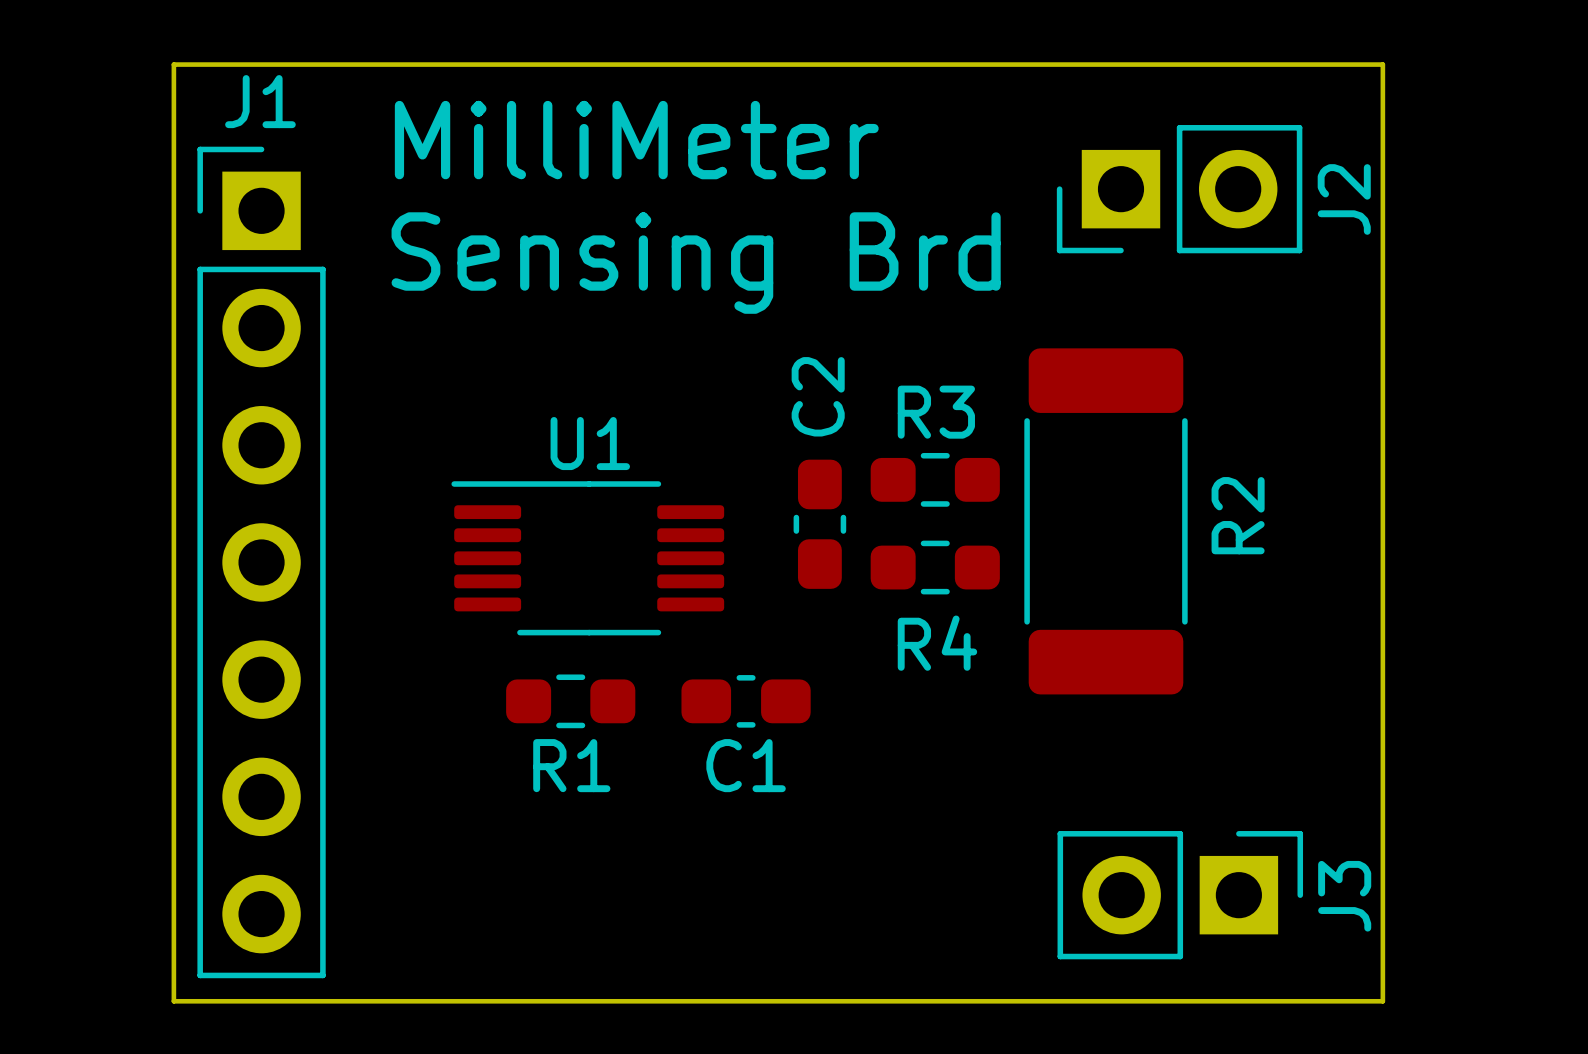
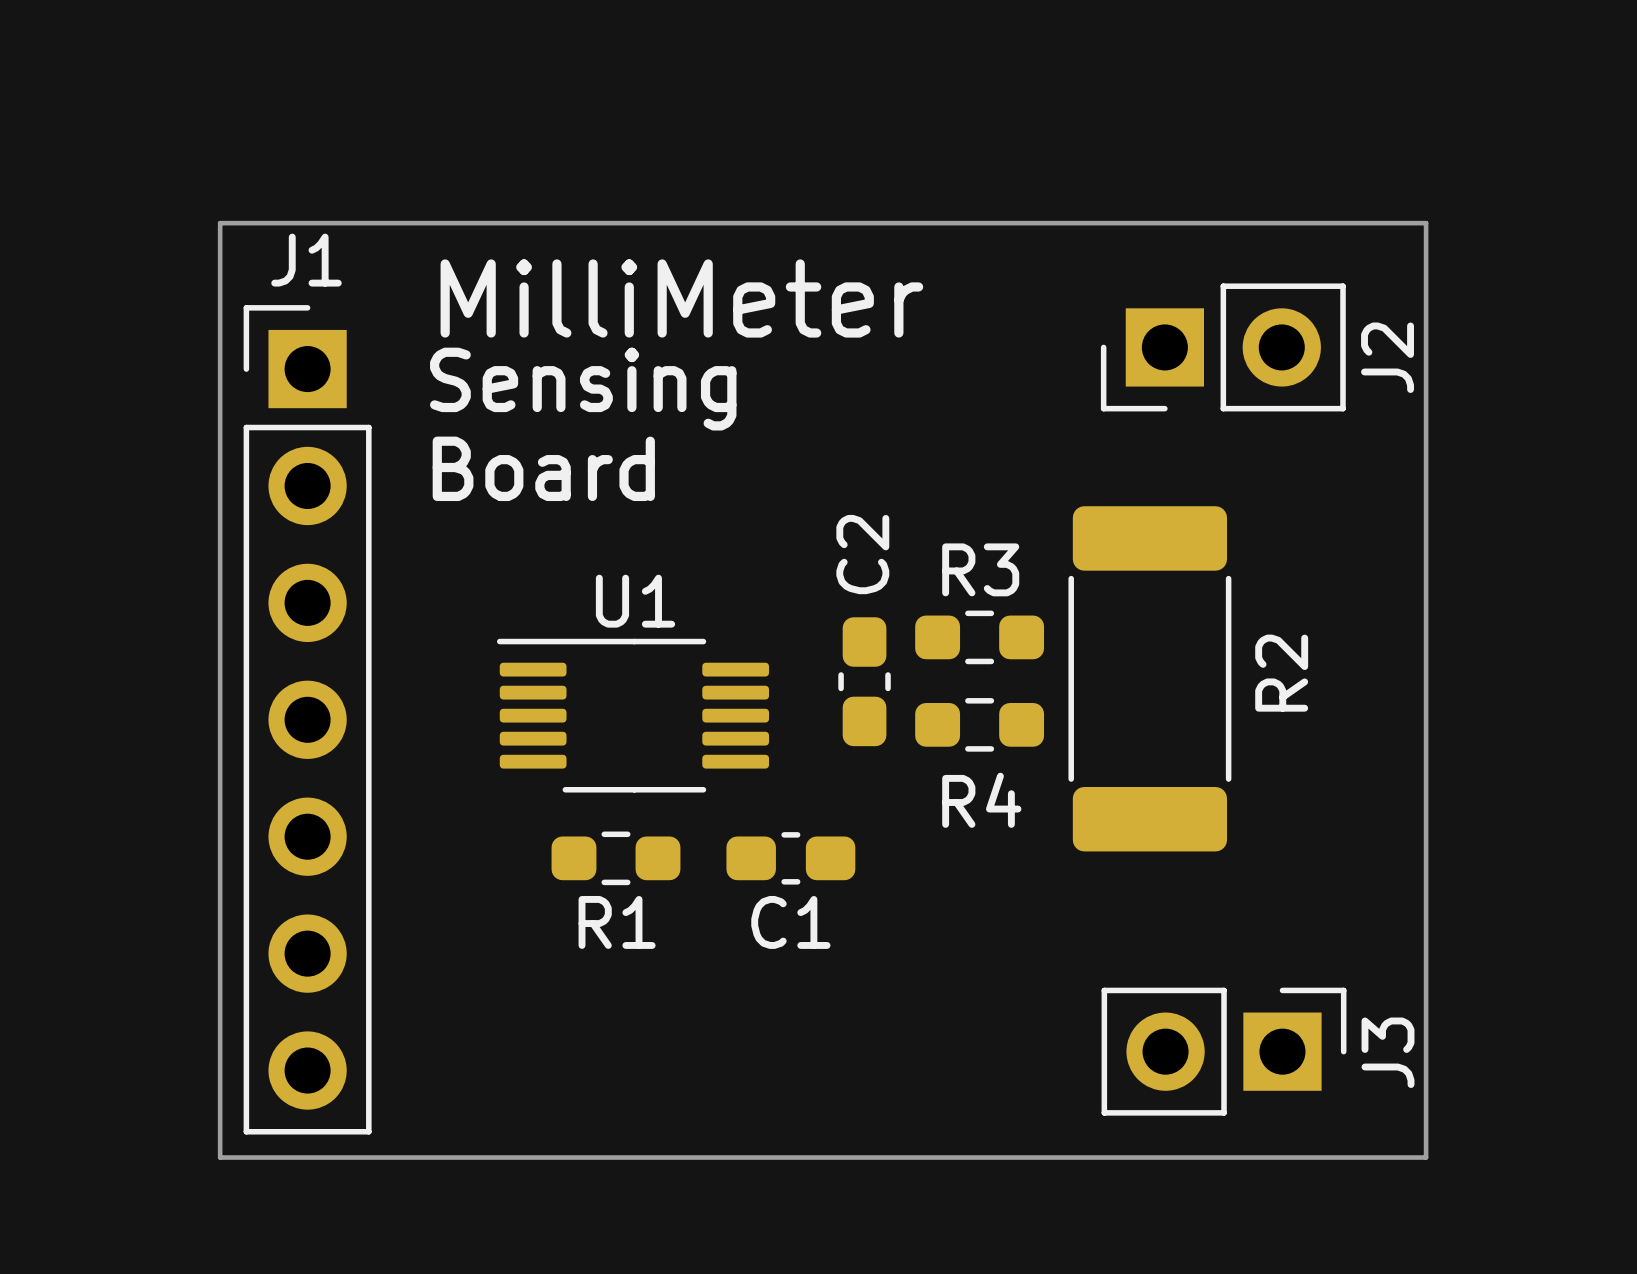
text: Sensing Brd (696, 263) -> Sensing (583, 389)
text: none -> Board (543, 468)

